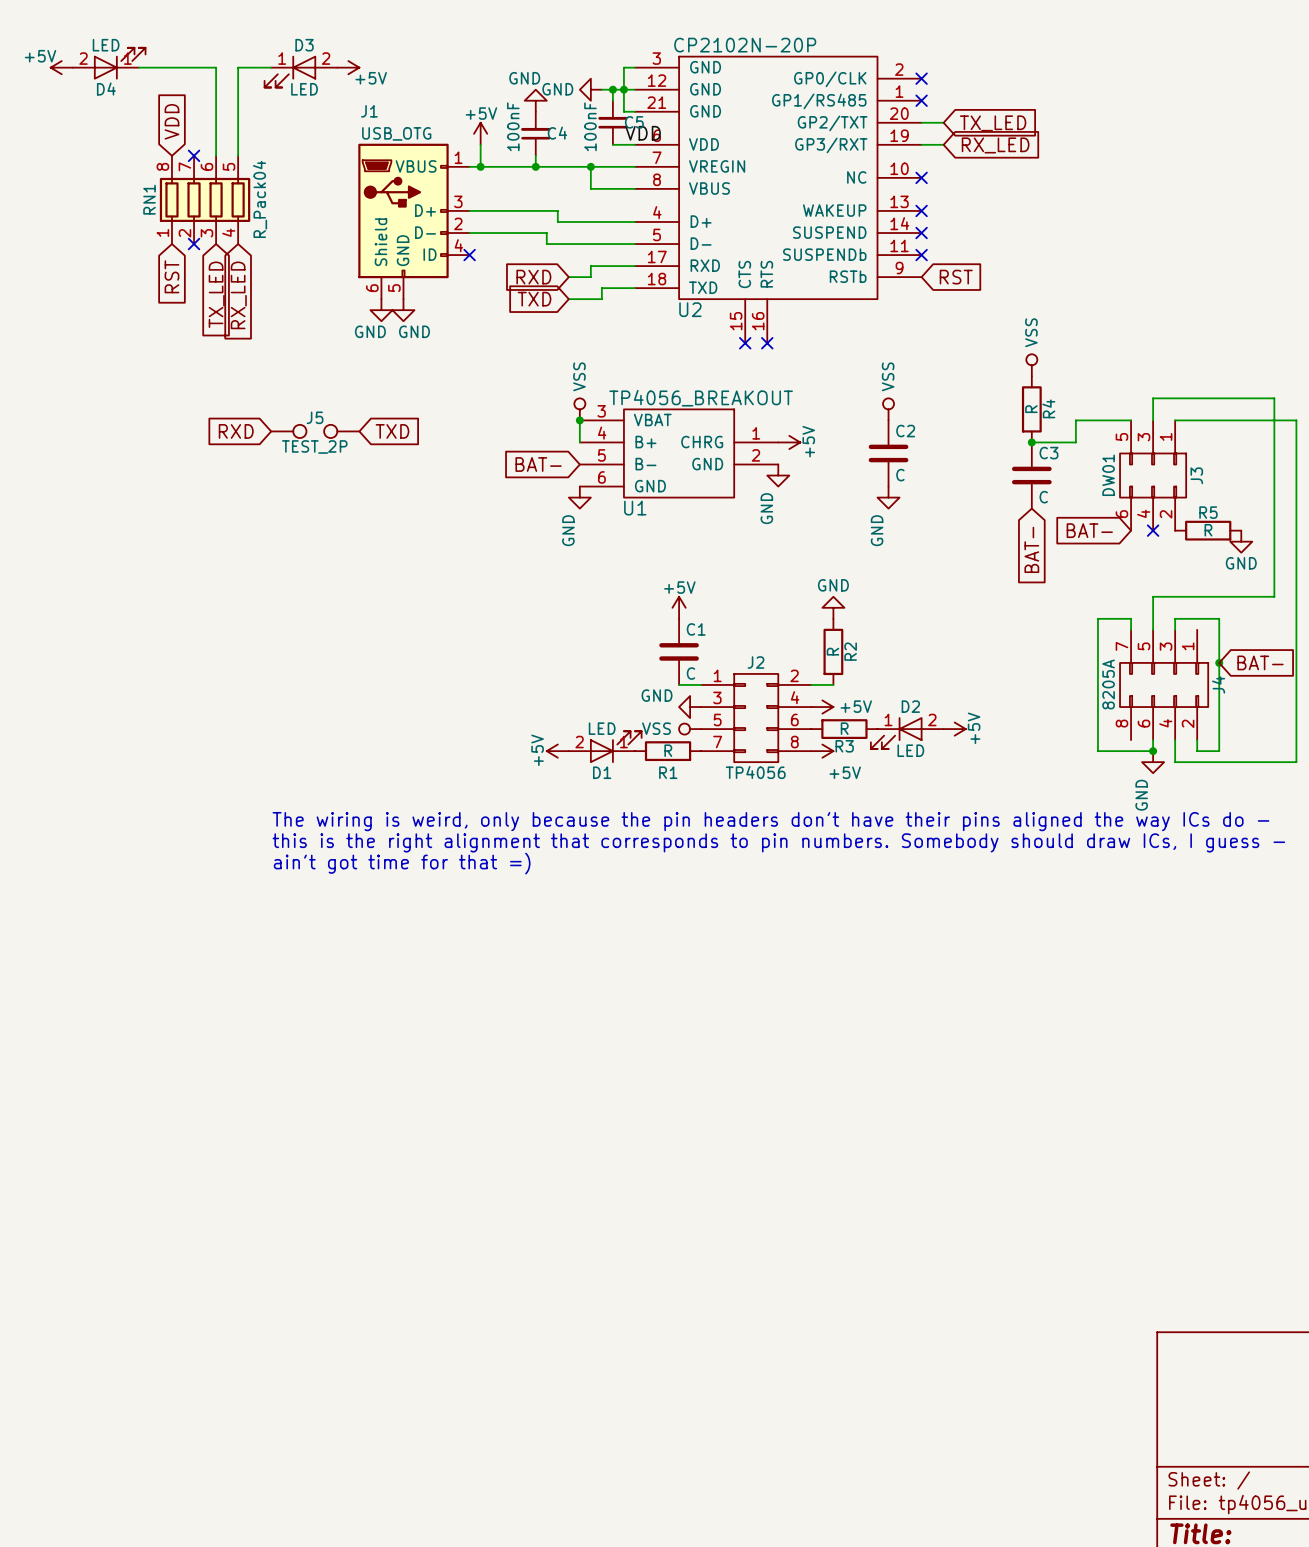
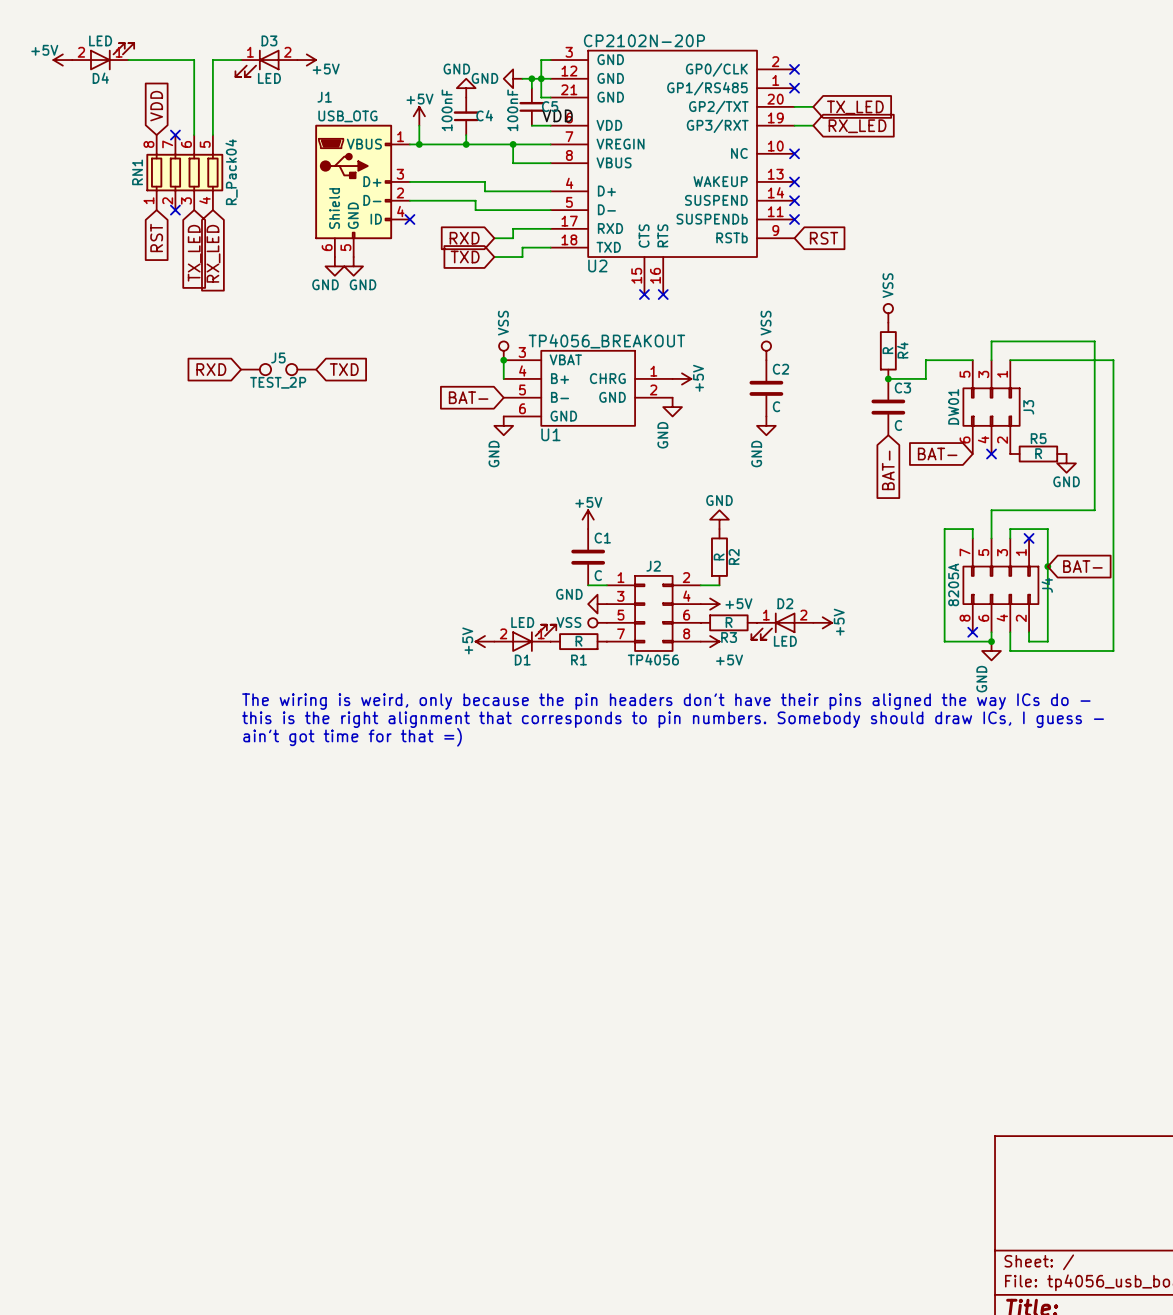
no-connect mark: none -> (1029, 538)
no-connect mark: none -> (972, 632)

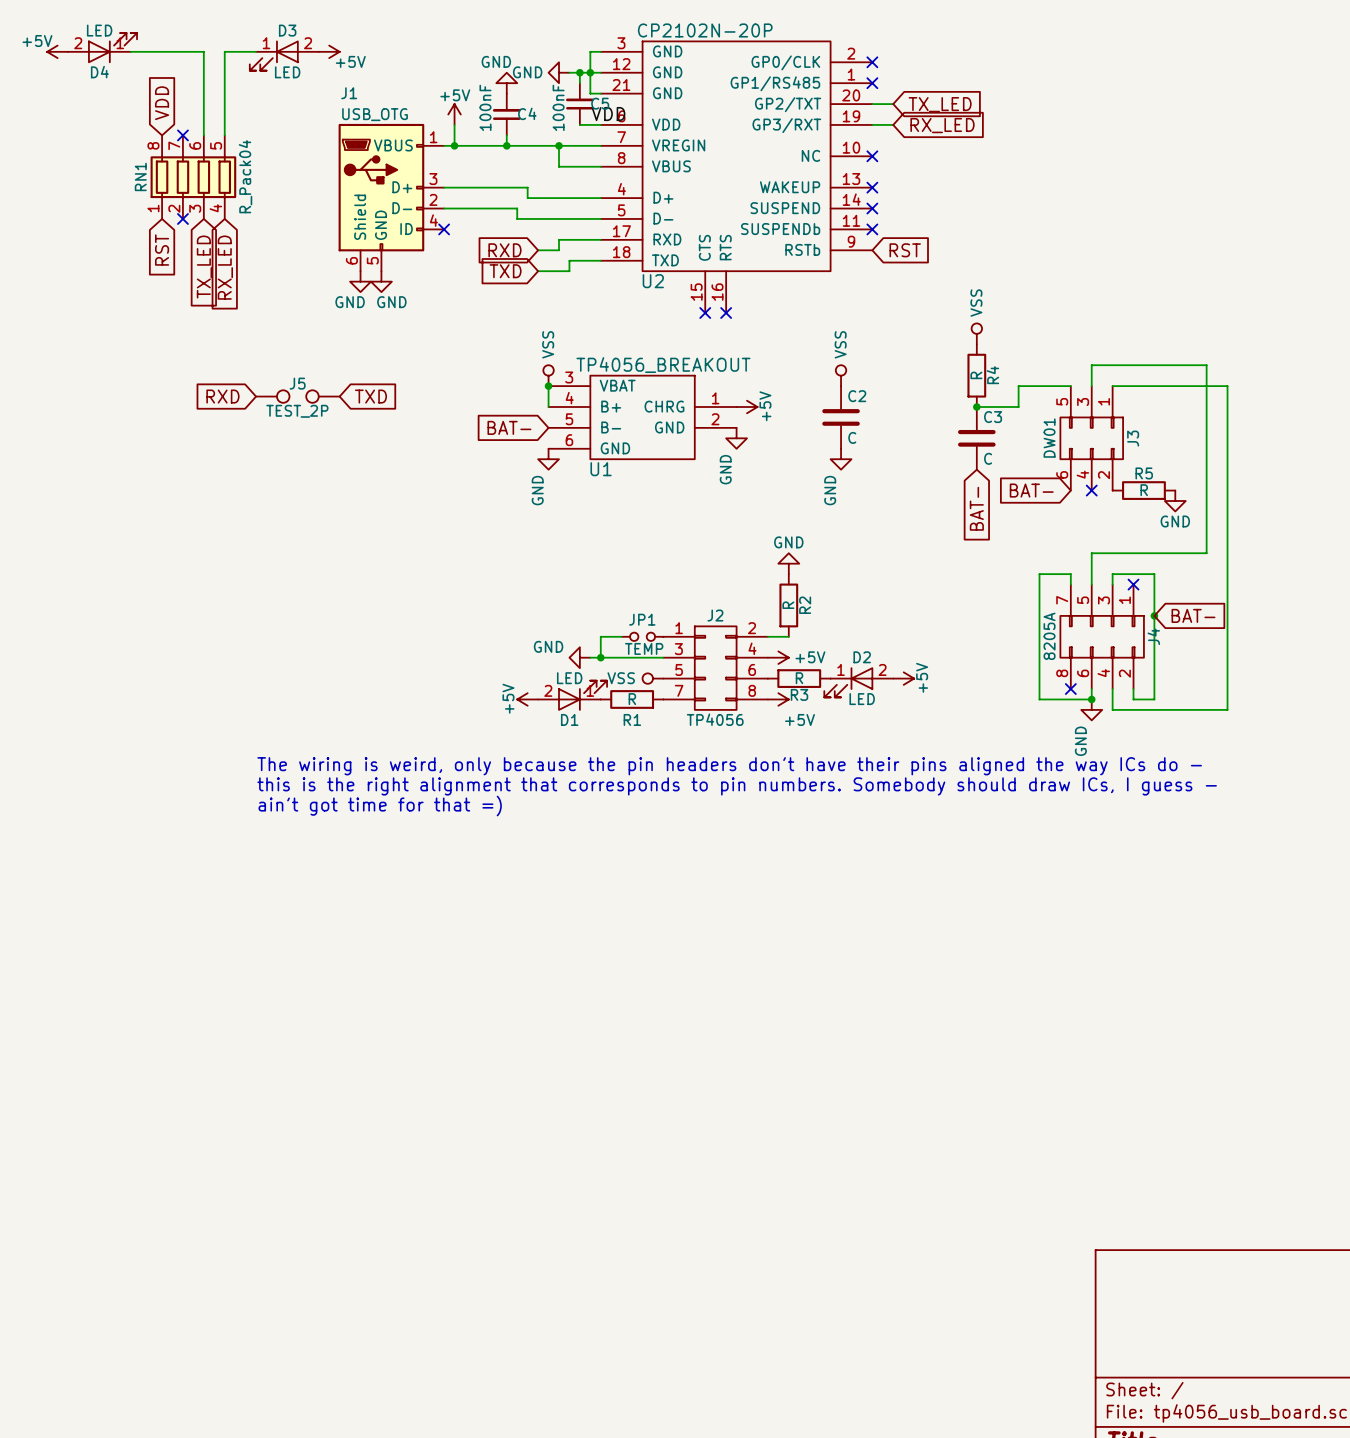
power symbol: +5V (588, 519) -> none
C1: C (588, 557) -> none
wire: none -> (621, 636) (600, 636) (600, 657)
JP1: none -> TEMP (642, 636)
wire: none -> (590, 657) (663, 657)
junction: none -> (600, 657)
power symbol position: GND (597, 604) -> GND (579, 657)

